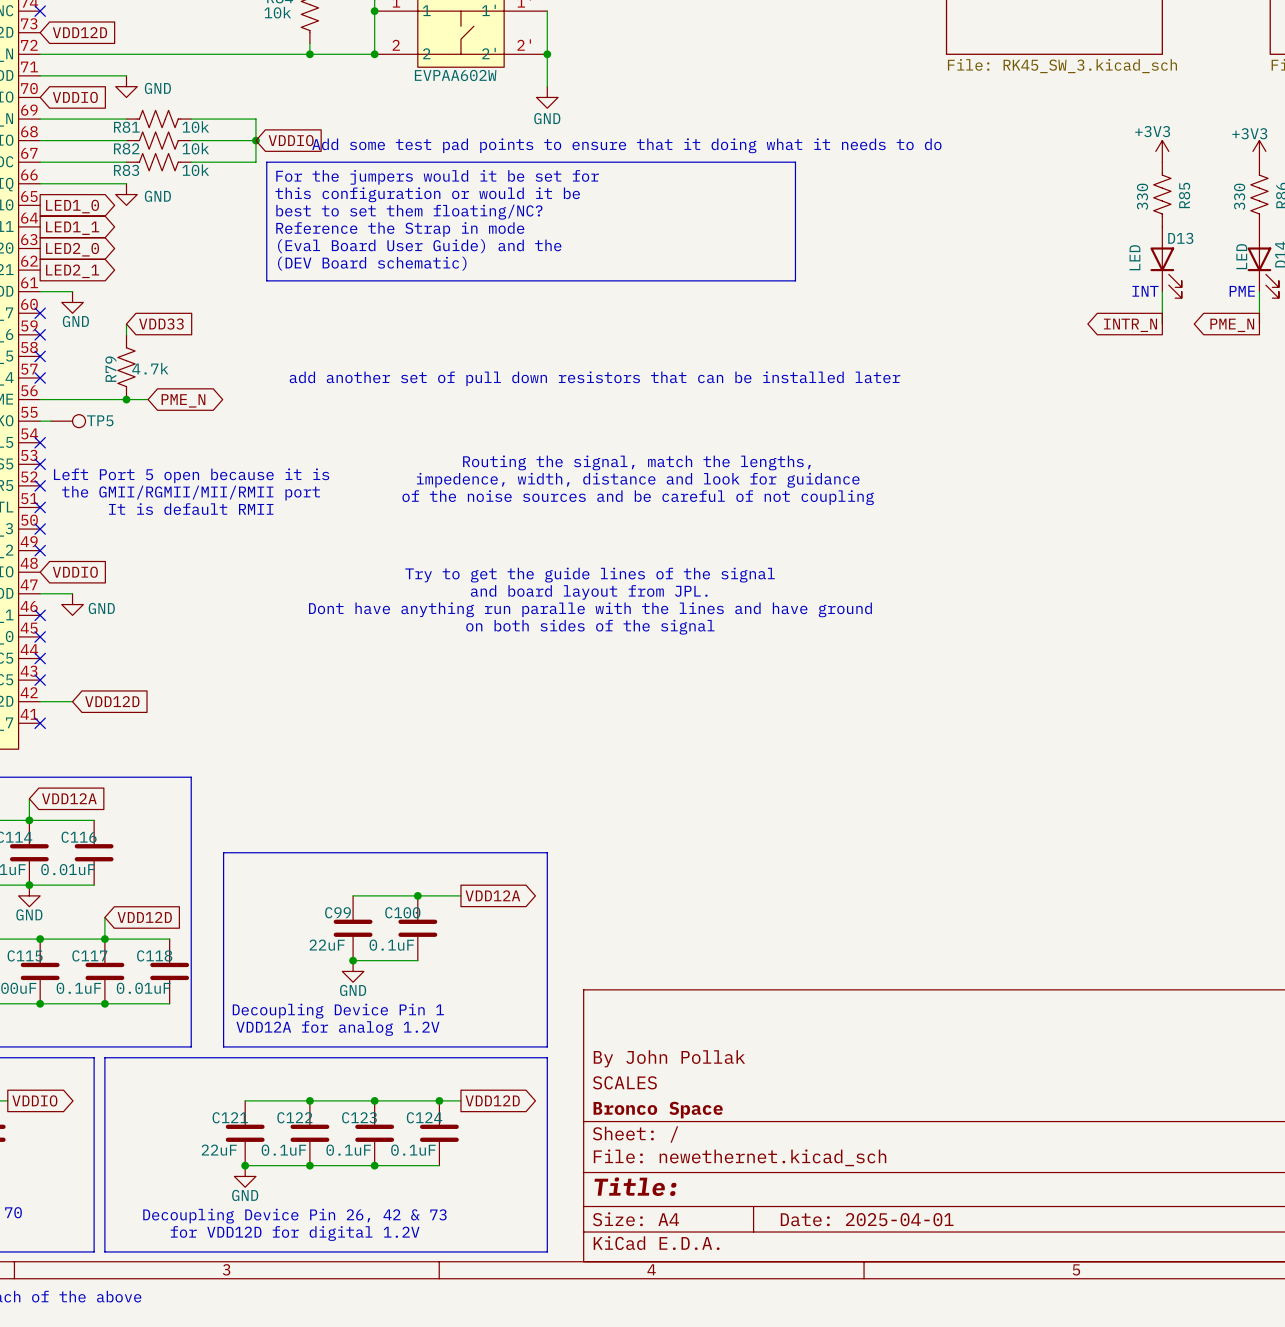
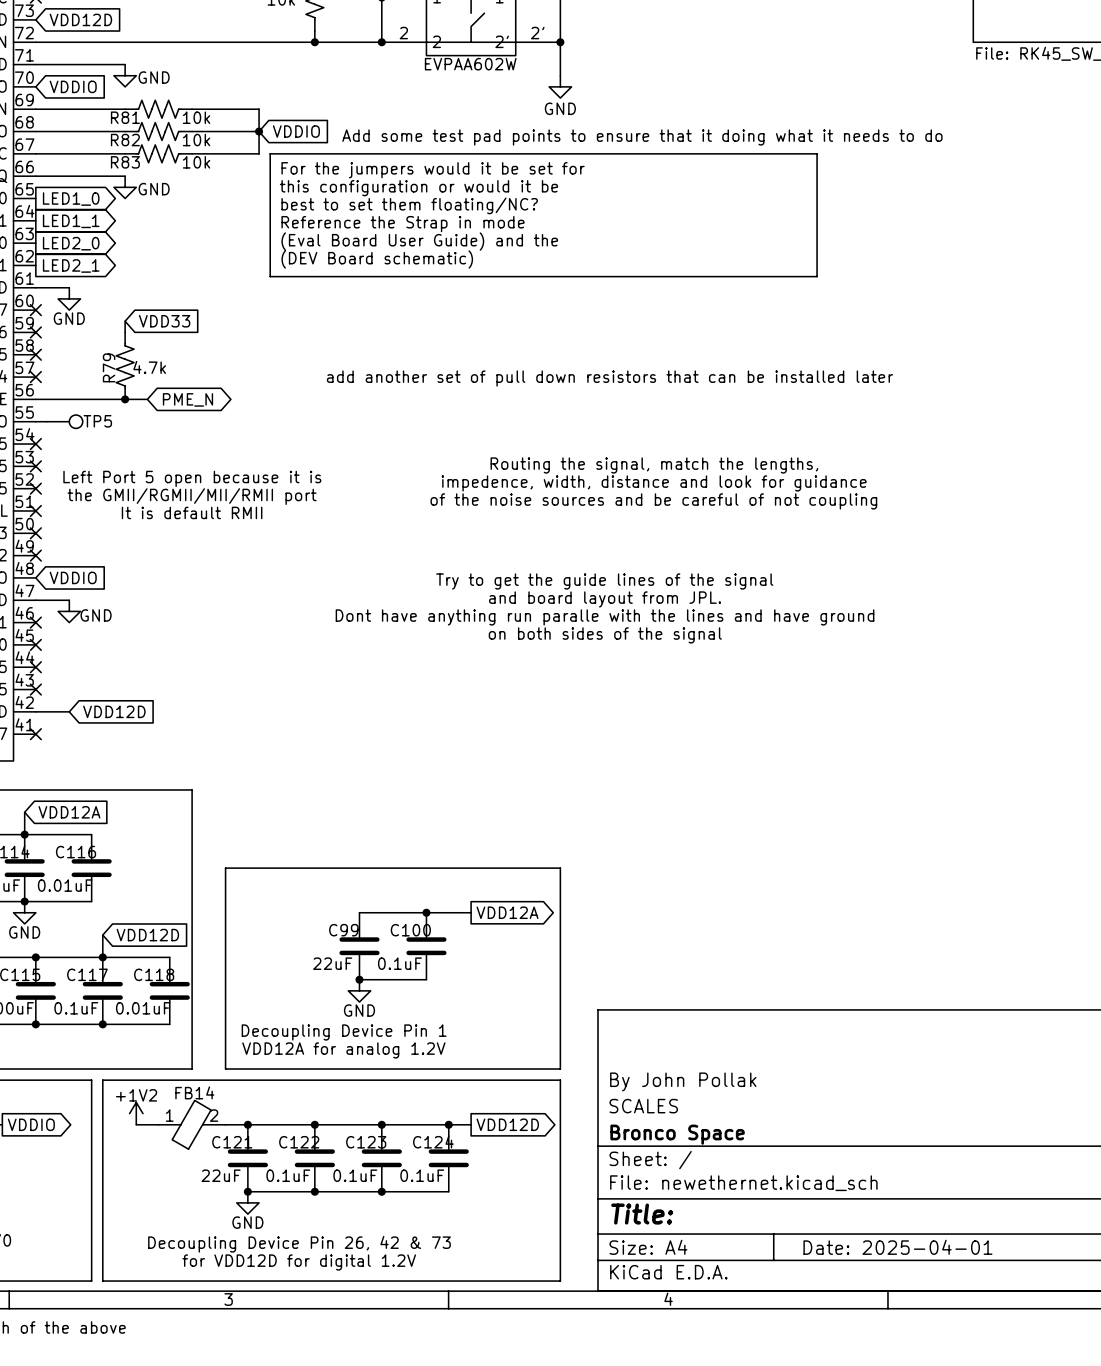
power symbol: none -> +1V2 (136, 1113)
wire: none -> (136, 1124) (158, 1124)
FB14: none -> (192, 1124)
wire: none -> (225, 1124) (247, 1124)
junction: none -> (247, 1124)

